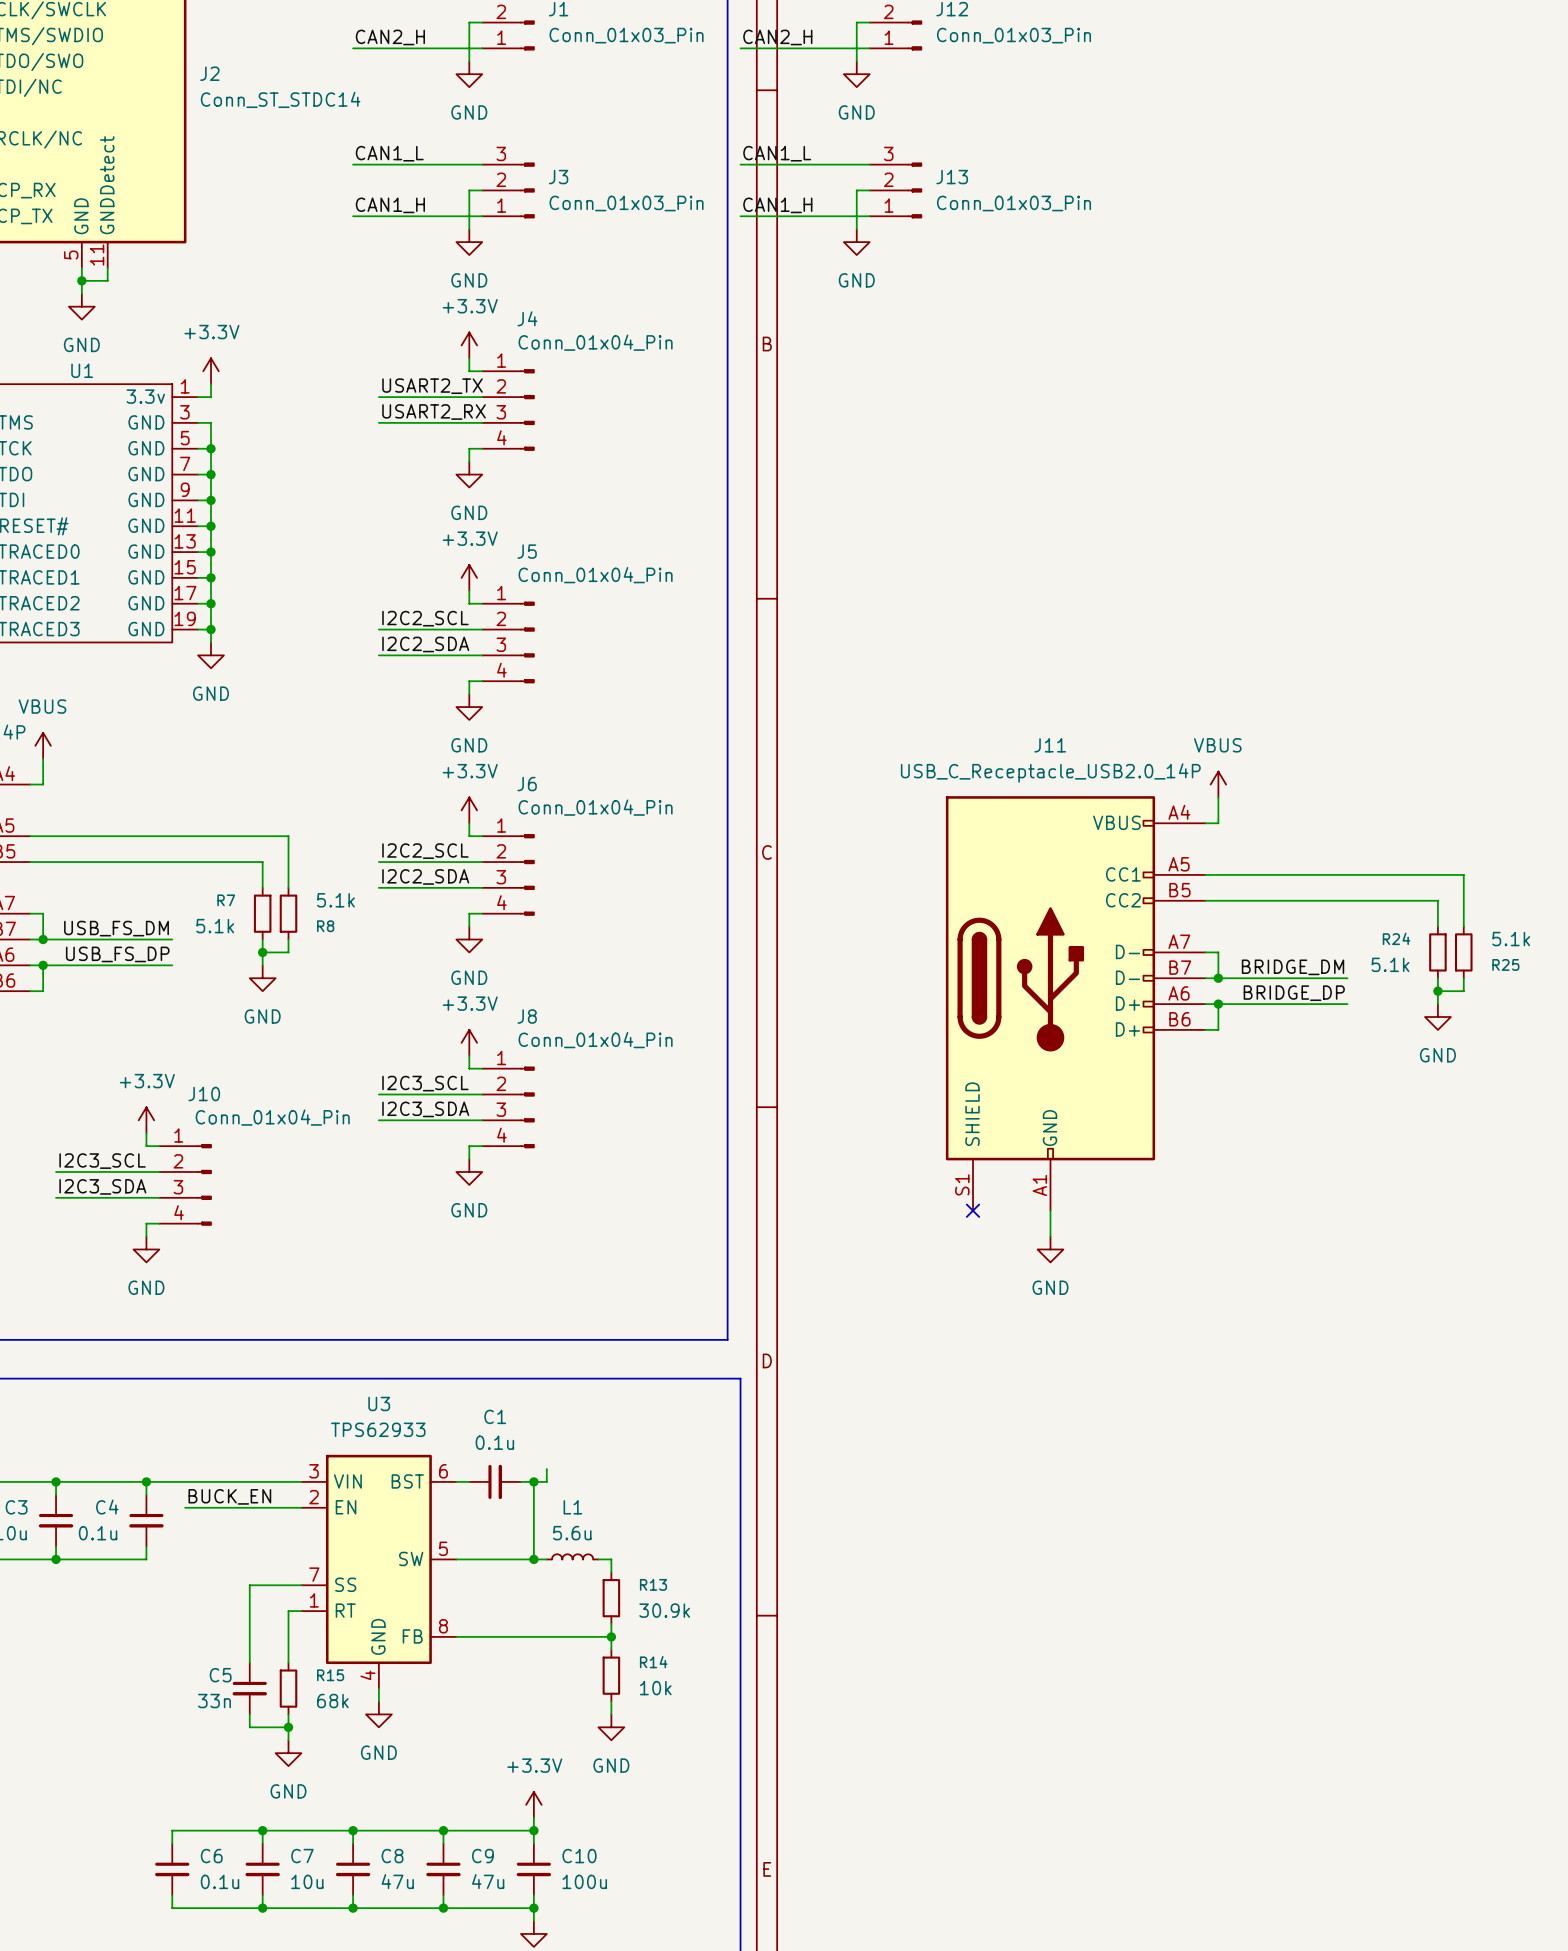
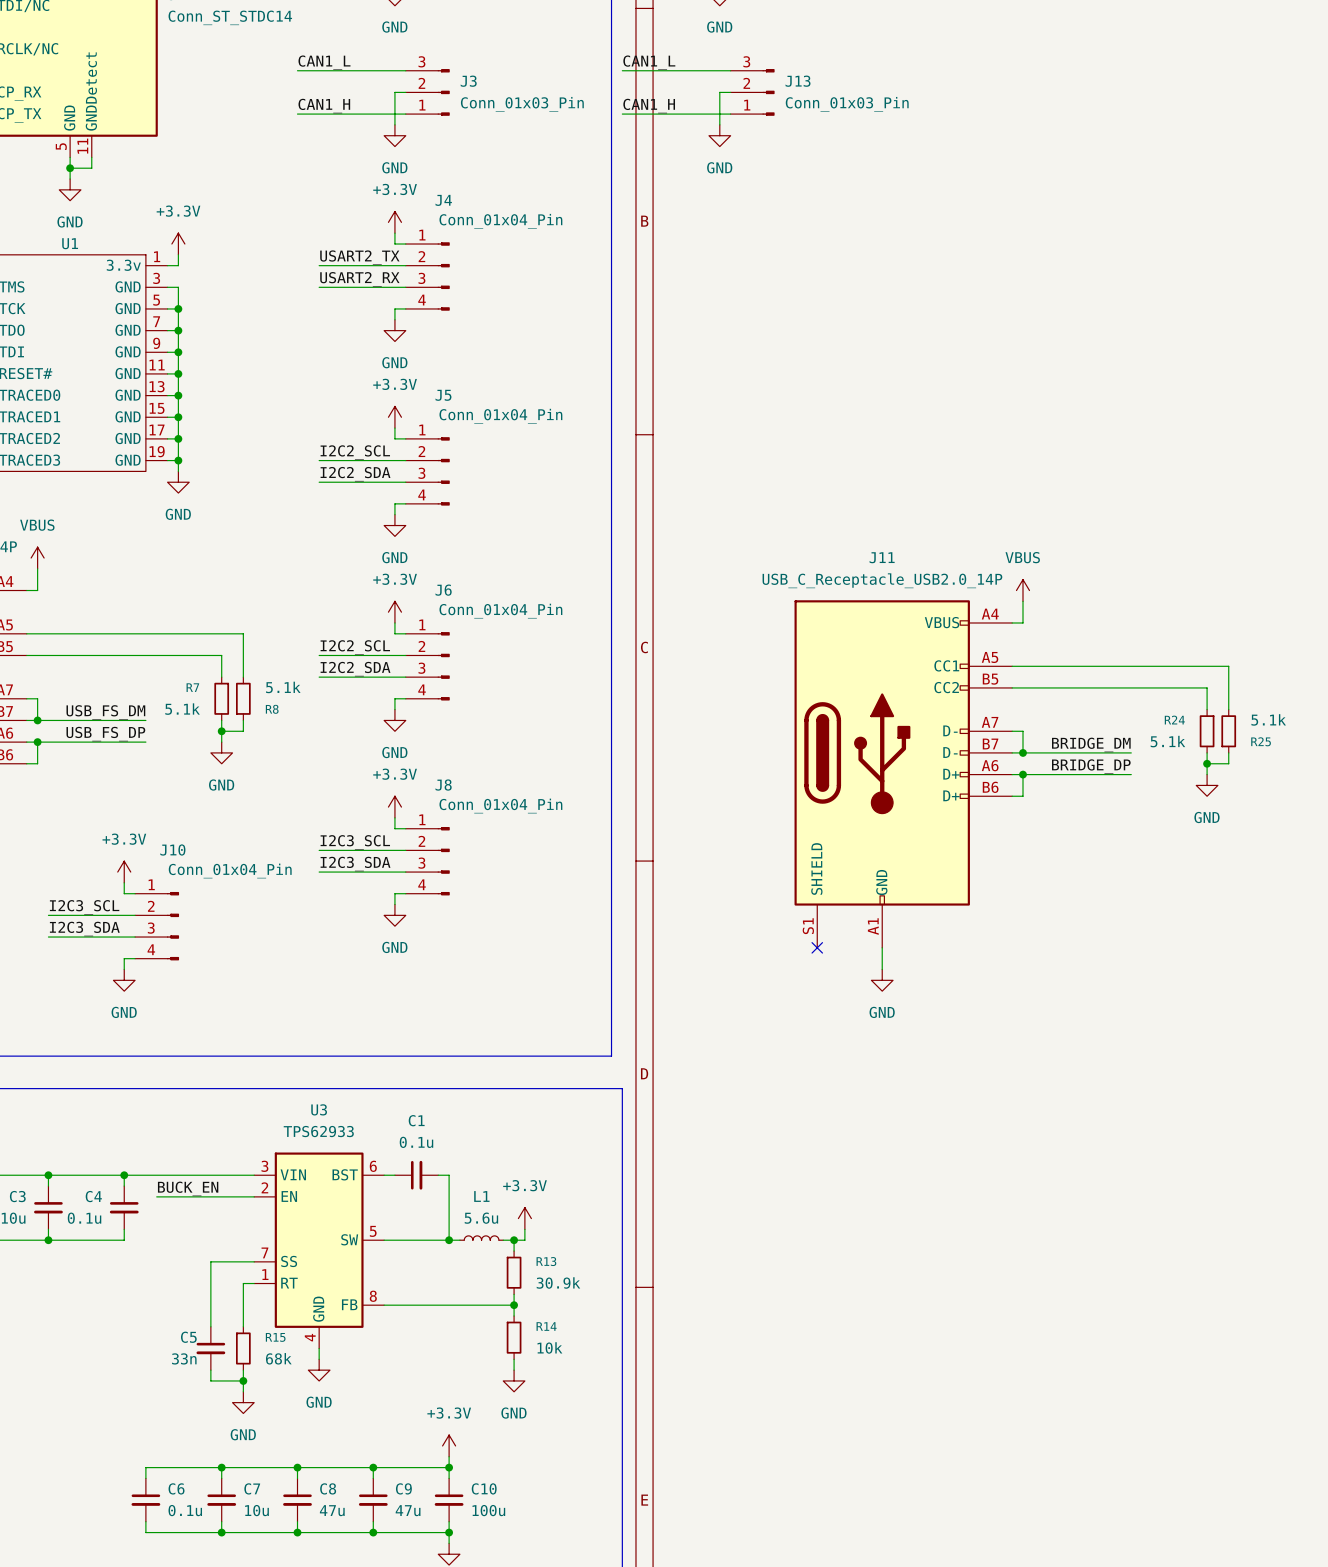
wire: (546, 1469) (546, 1481) (533, 1481) -> (524, 1229) (524, 1240) (514, 1240)
junction: (533, 1481) -> none
power symbol: none -> +3.3V (524, 1218)
junction: none -> (514, 1240)

